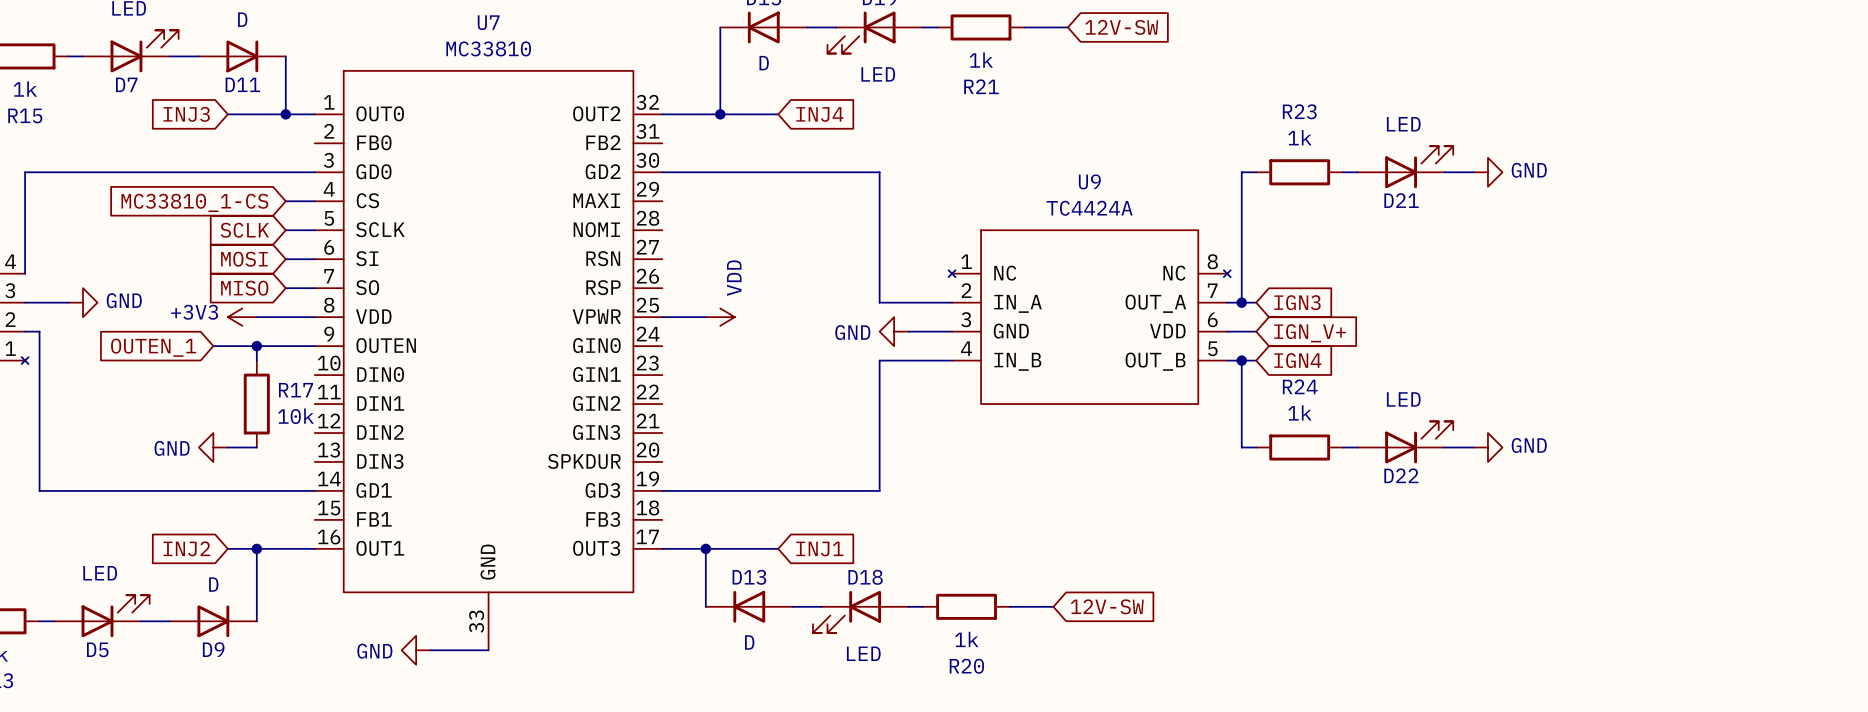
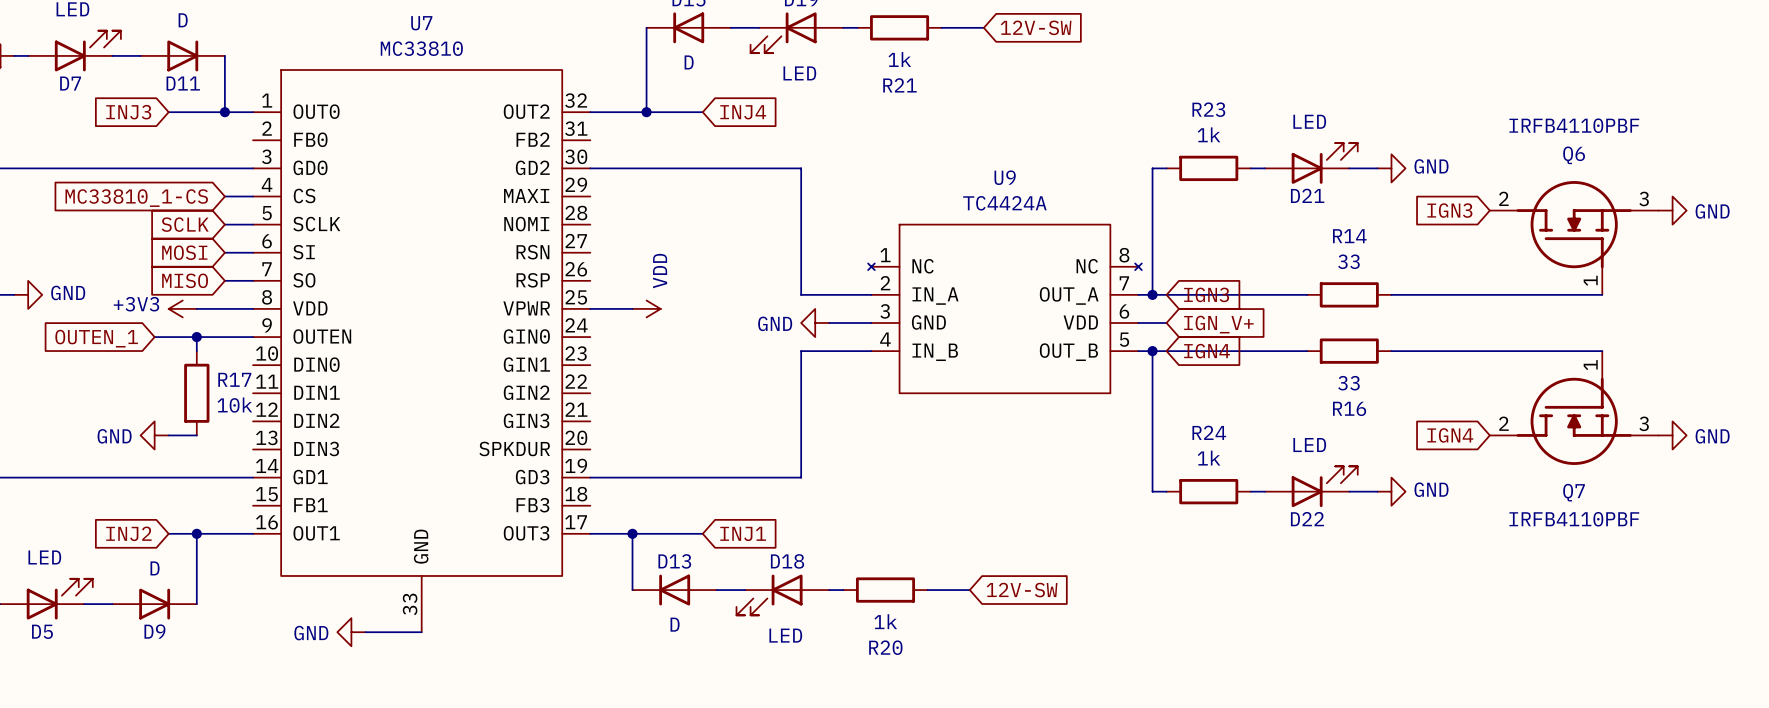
global label: none -> IGN3 (1449, 210)
power symbol: none -> GND (1672, 210)
Q6: none -> IRFB4110PBF (1574, 237)
wire: none -> (1166, 294) (1307, 294)
R14: none -> 33 (1349, 294)
wire: none -> (1391, 294) (1602, 294)
wire: none -> (1166, 351) (1307, 351)
R16: none -> 33 (1349, 351)
wire: none -> (1391, 351) (1602, 351)
Q7: none -> IRFB4110PBF (1574, 408)
D22 position: (1405, 442) -> (1311, 486)
wire: (1241, 447) (1256, 447) -> (1152, 435) (1152, 491) (1166, 491)
R24 position: (1299, 447) -> (1208, 491)
wire: (1343, 447) (1357, 447) -> (1250, 491) (1264, 491)
wire: (1444, 447) (1473, 447) -> (1349, 491) (1377, 491)
power symbol position: GND (1487, 447) -> GND (1391, 491)
global label: none -> IGN4 (1450, 435)
power symbol: none -> GND (1672, 435)

